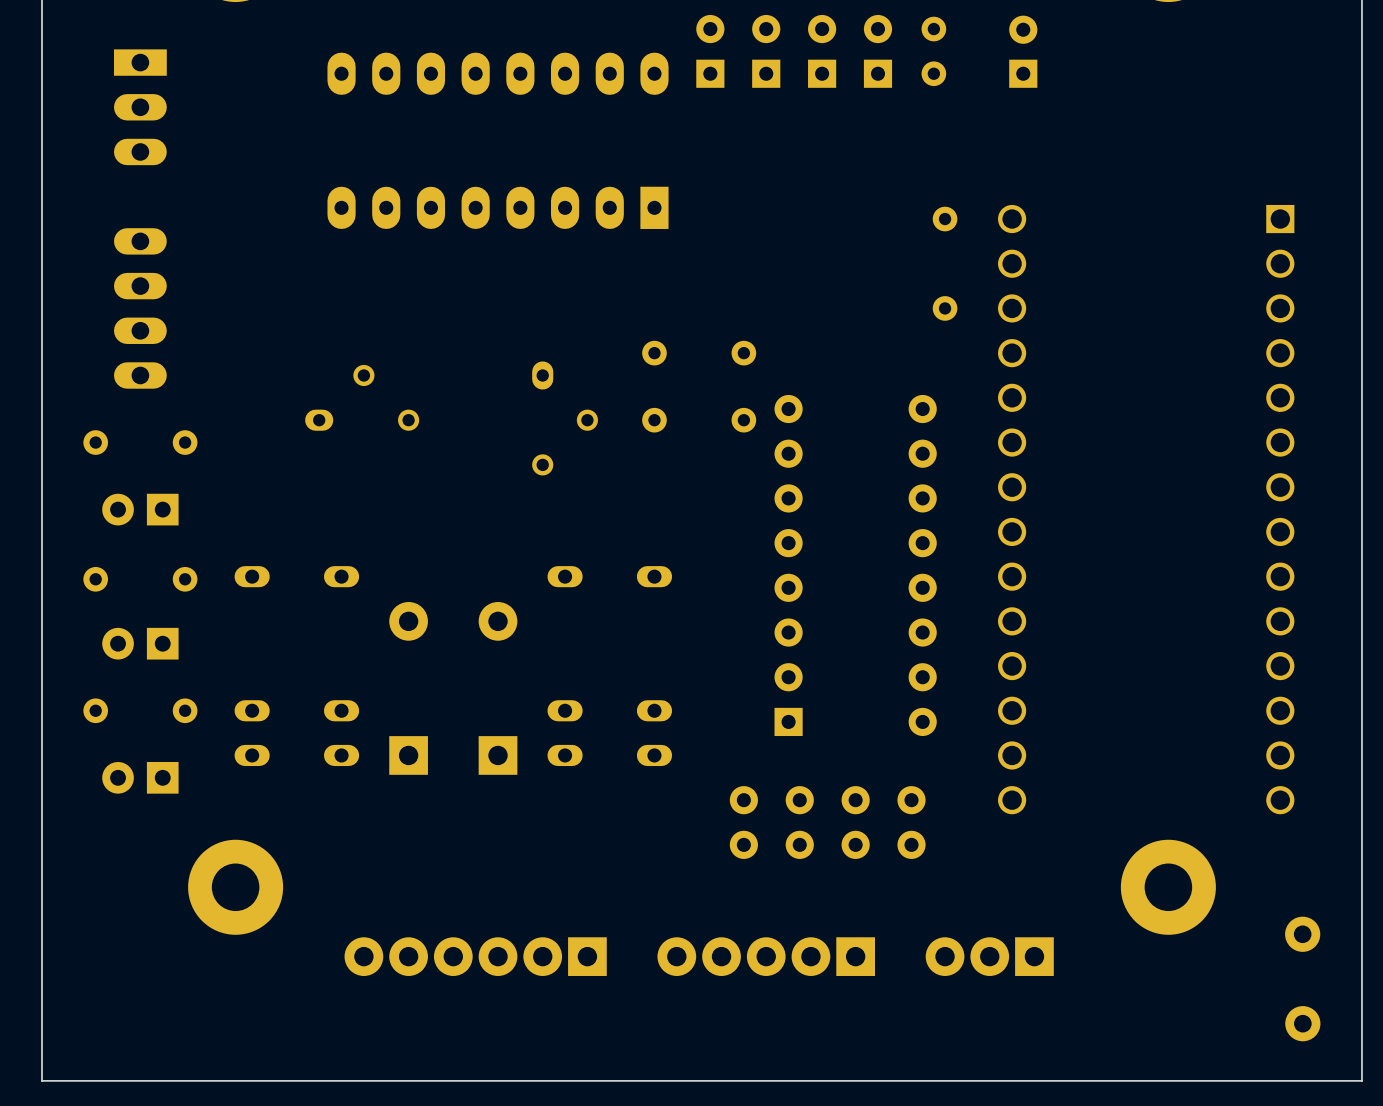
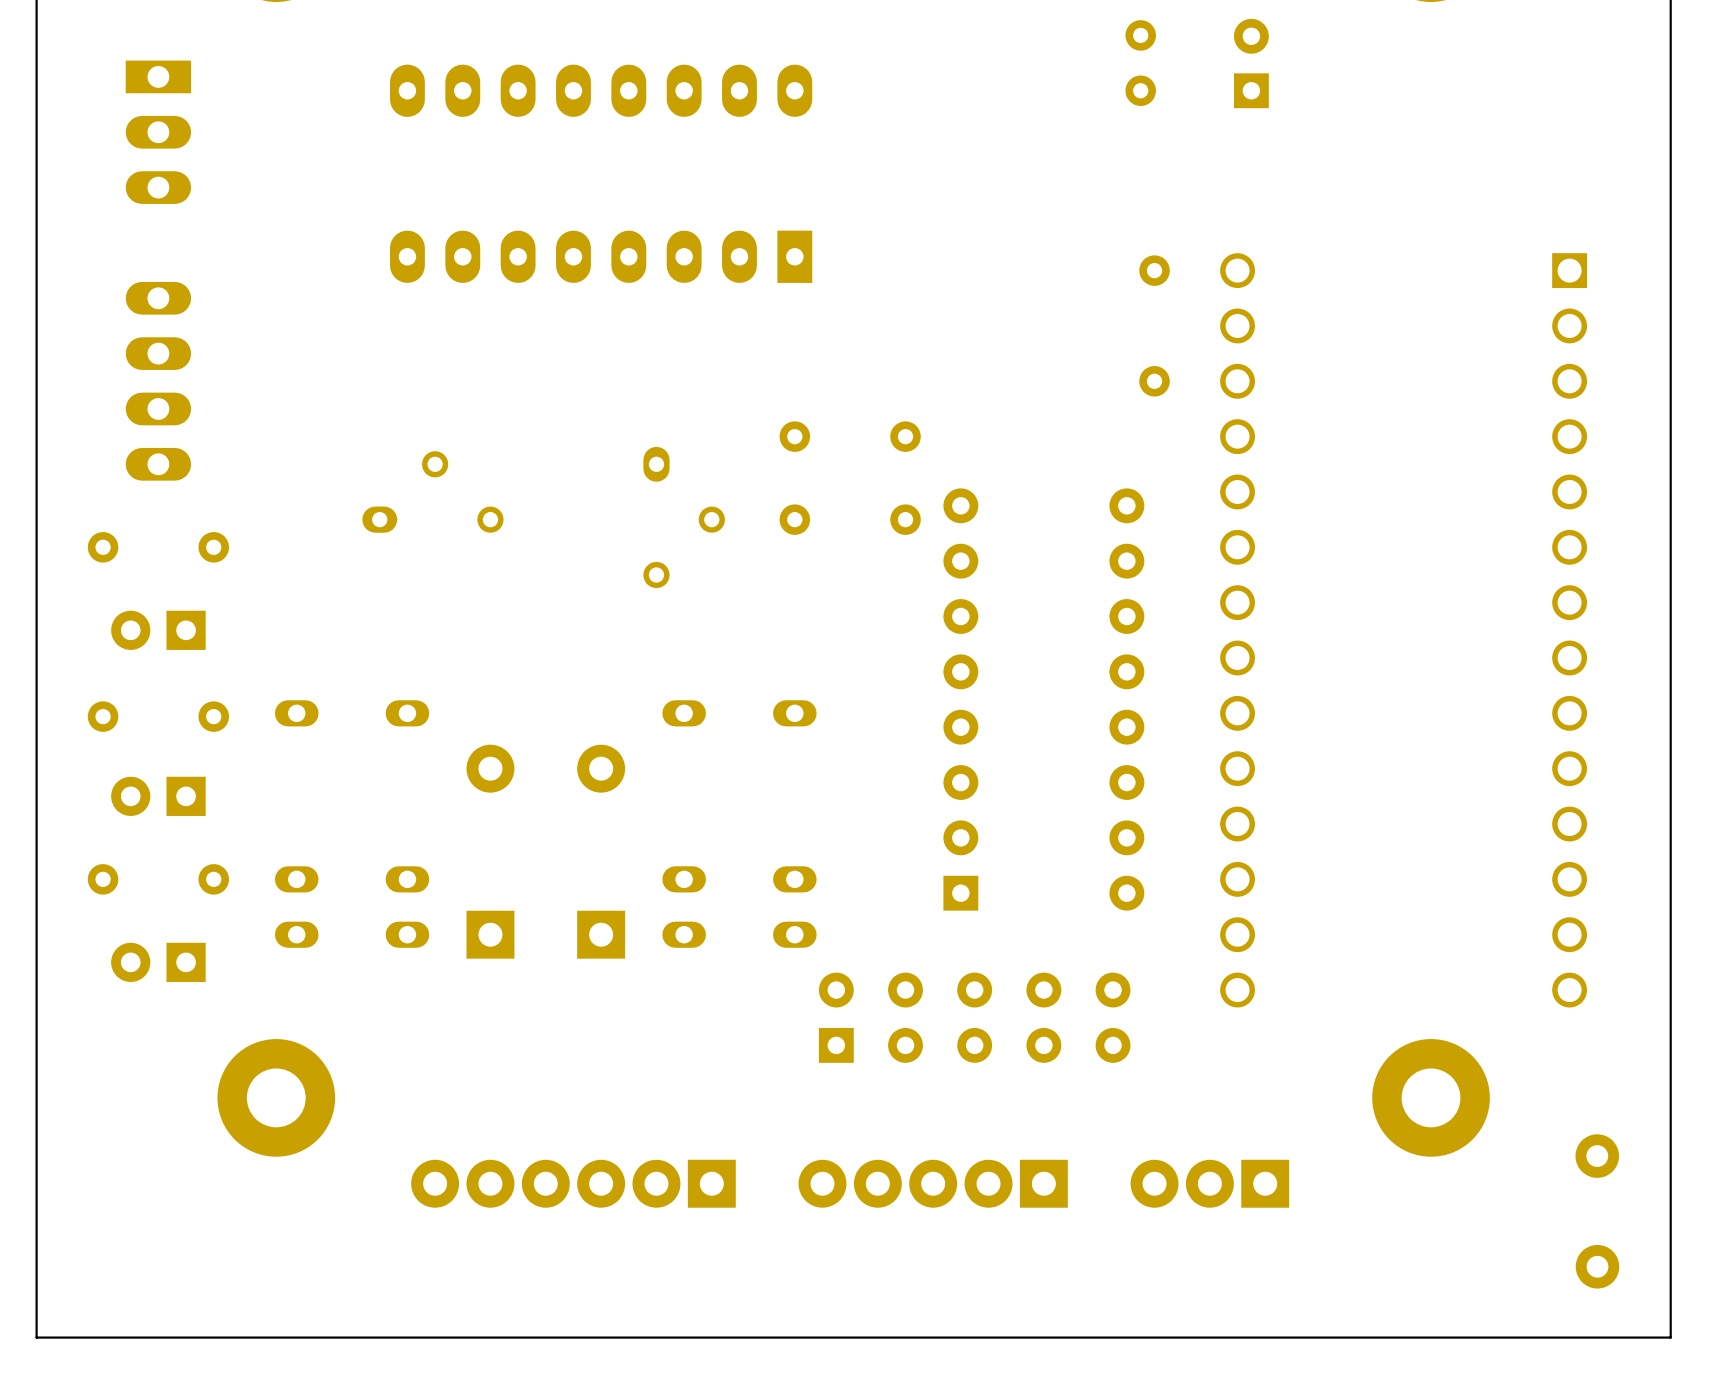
part: (710, 51) -> none
part: (766, 51) -> none
part: (822, 51) -> none
part: (877, 51) -> none
part: none -> (836, 1017)

